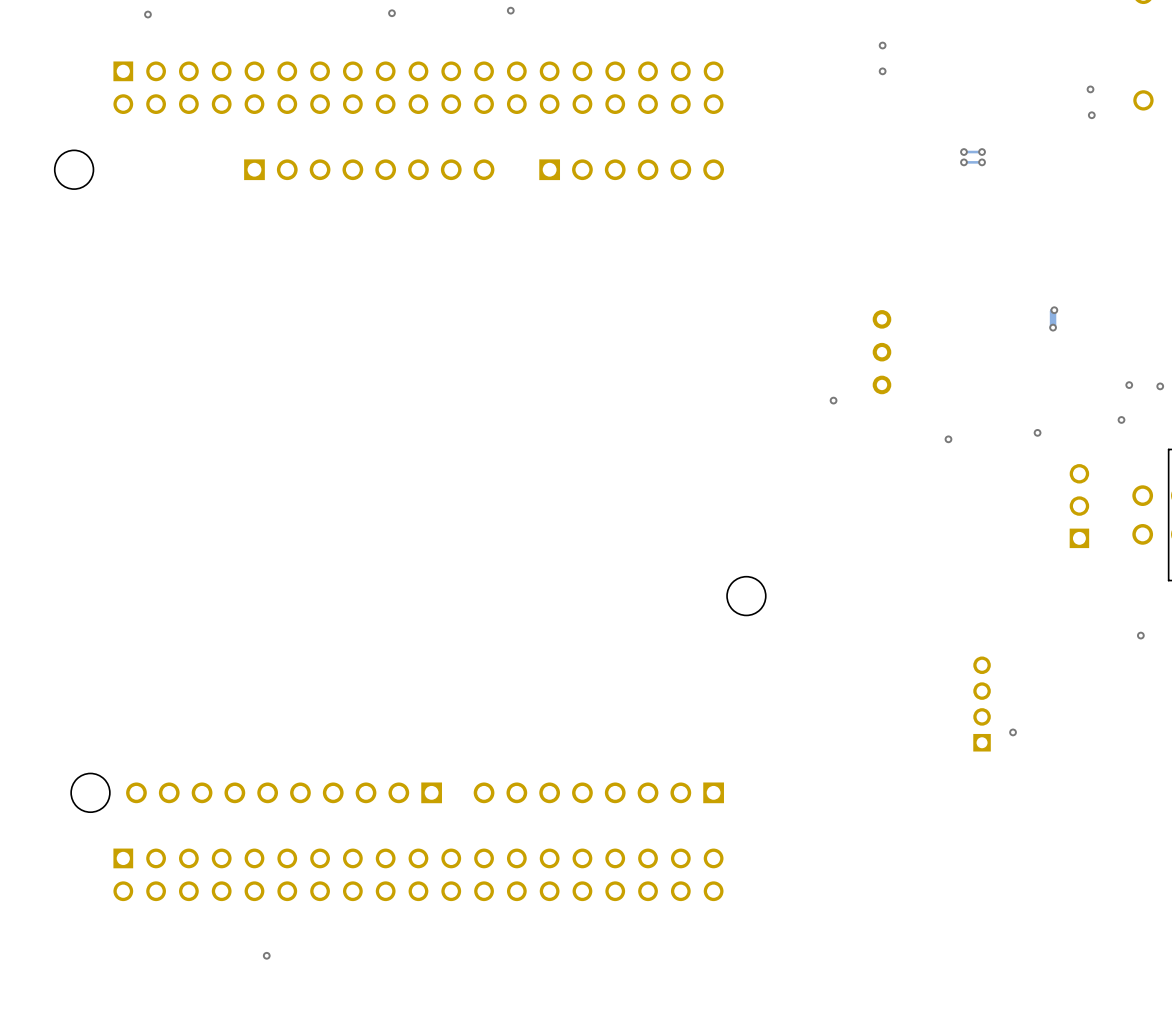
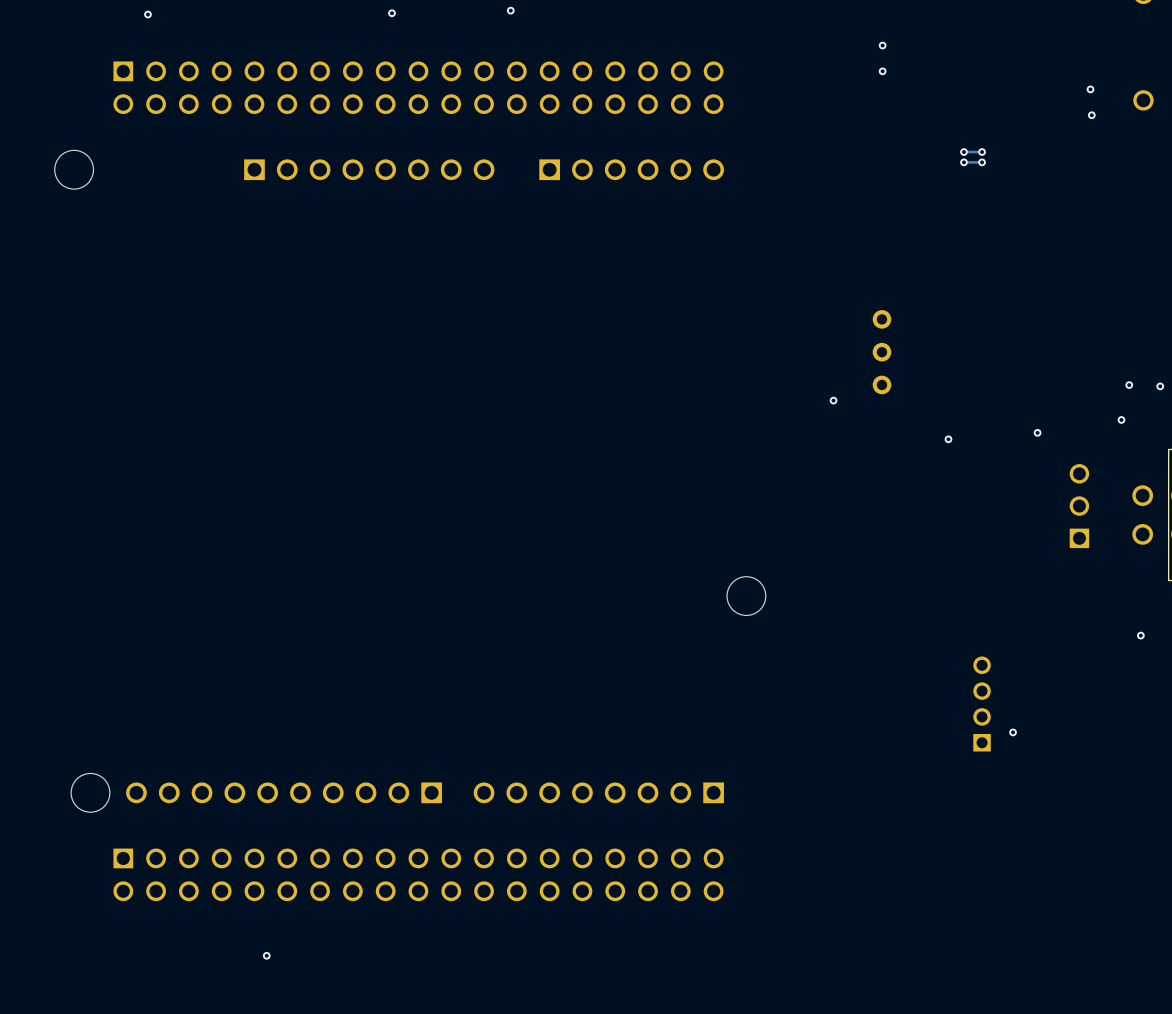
track: (1054, 310) (1053, 327) -> none
via: (1054, 310) -> none
via: (1053, 327) -> none

